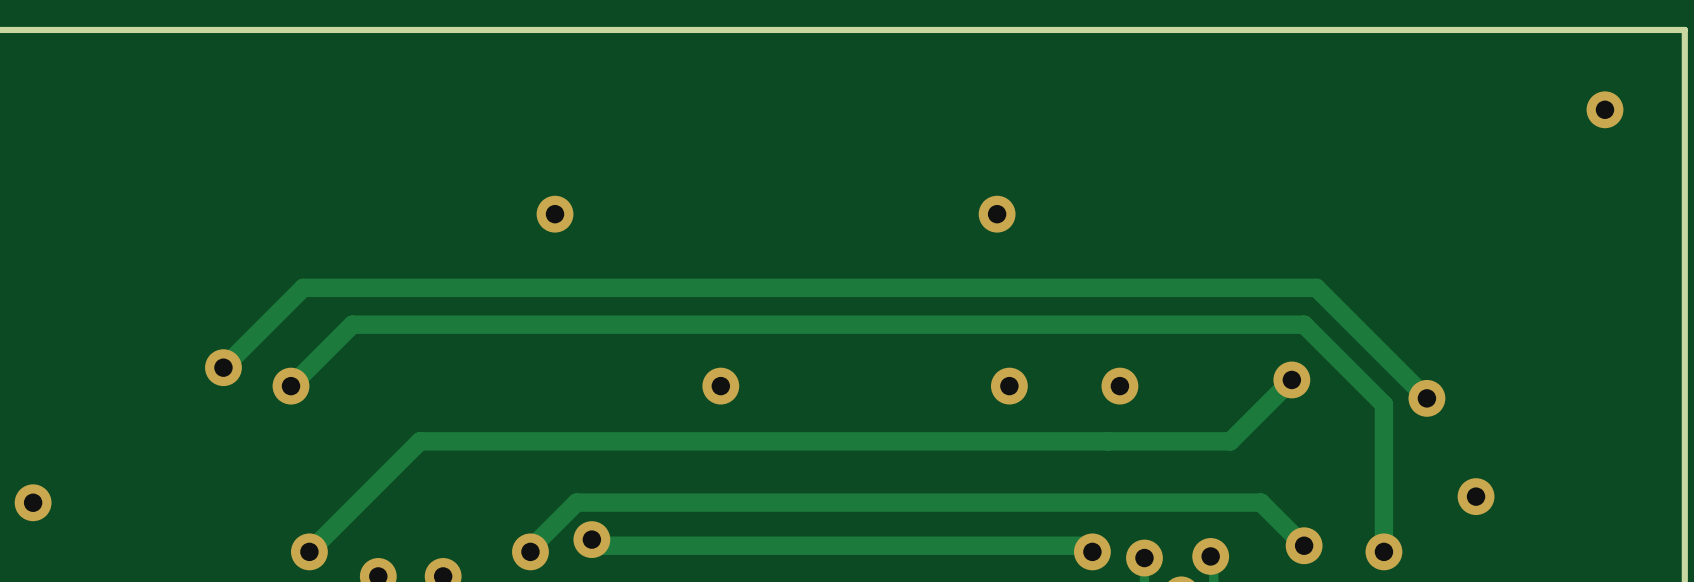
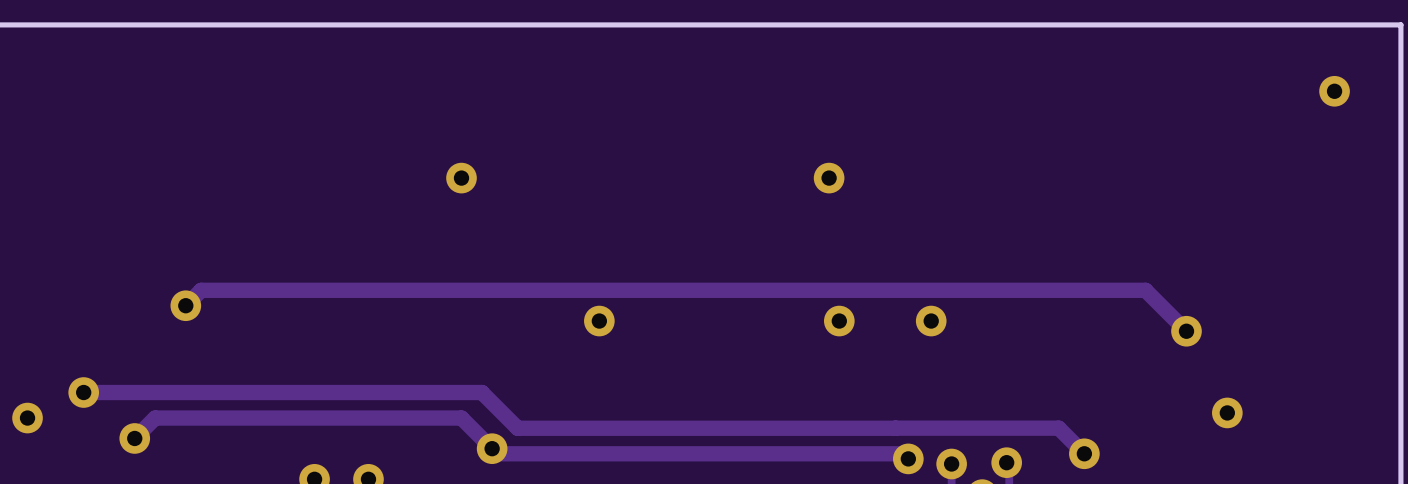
track: (1377, 349) (1316, 287) (303, 287) (241, 349) -> (1145, 290) (201, 290)
track: (1291, 379) (1230, 441) (419, 441) (309, 551) -> none
via: (1291, 379) -> none
track: (291, 386) (352, 324) (1304, 324) (1383, 404) (1383, 551) -> none
via: (291, 386) -> none
via: none -> (83, 392)
track: (1273, 514) (1261, 502) (576, 502) (530, 548) (530, 551) -> (1058, 428) (517, 428) (481, 392) (83, 392)
track: none -> (134, 438) (155, 418) (461, 418) (492, 448)
via: none -> (134, 438)
via: (309, 551) -> none
via: (530, 551) -> none
via: (1383, 551) -> none

